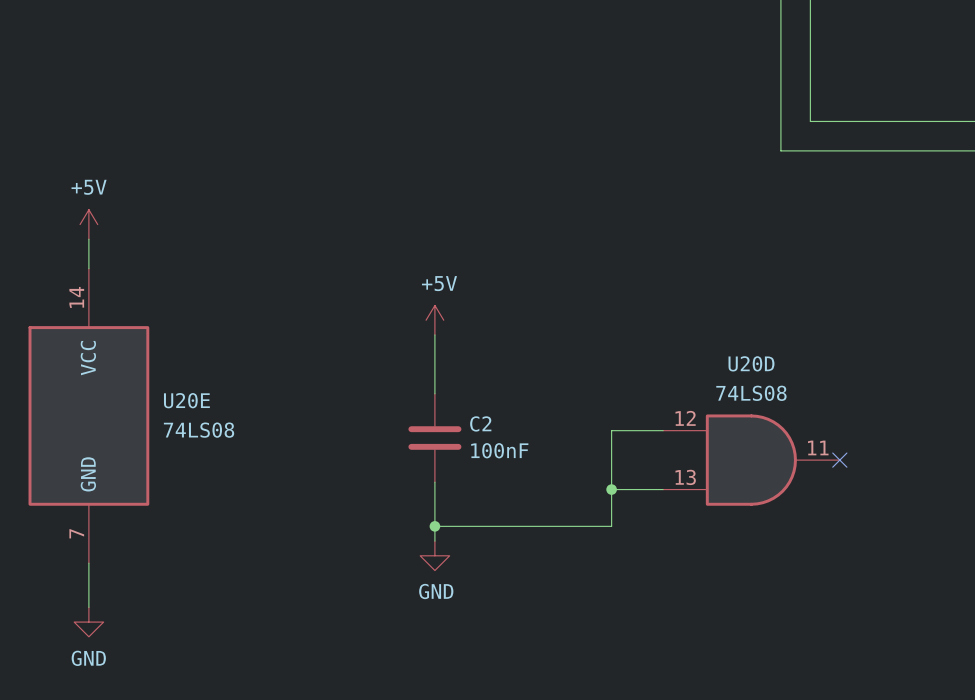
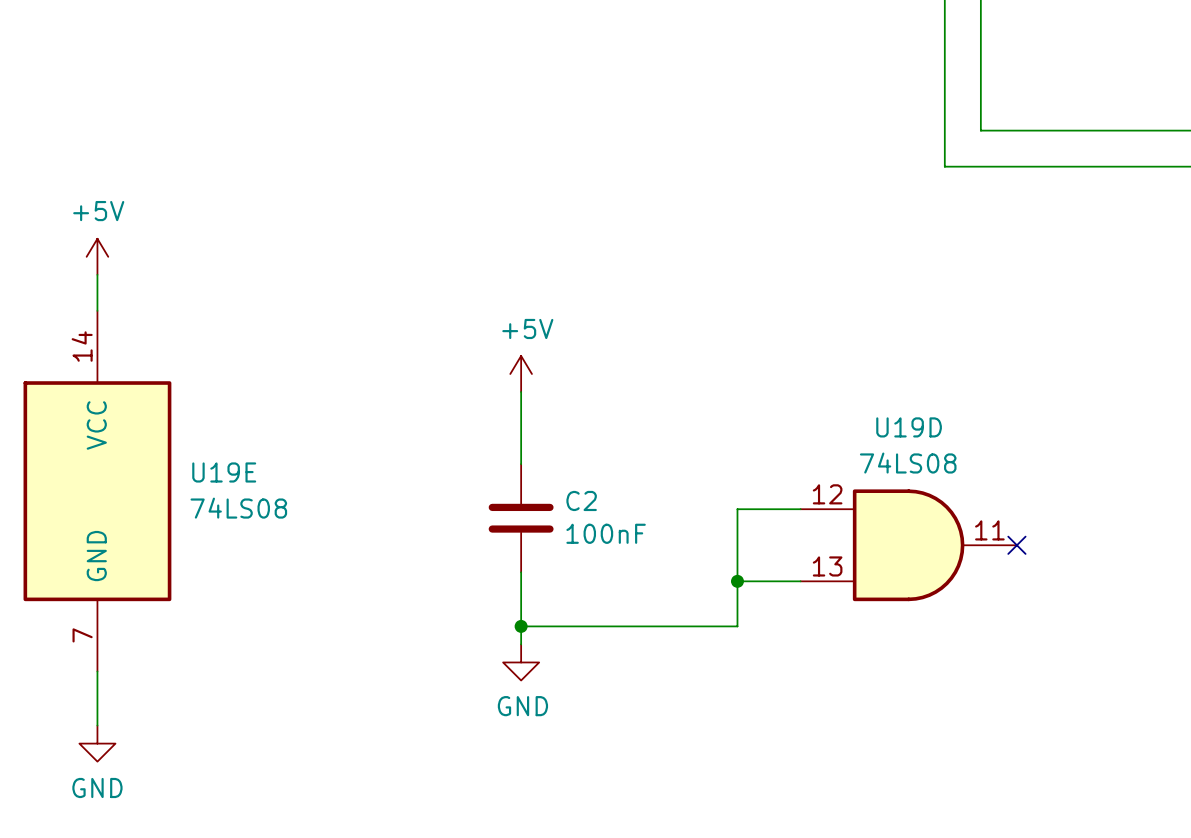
U20D name: U20D (751, 363) -> U19D (909, 427)
U20E name: U20E (186, 400) -> U19E (224, 472)

